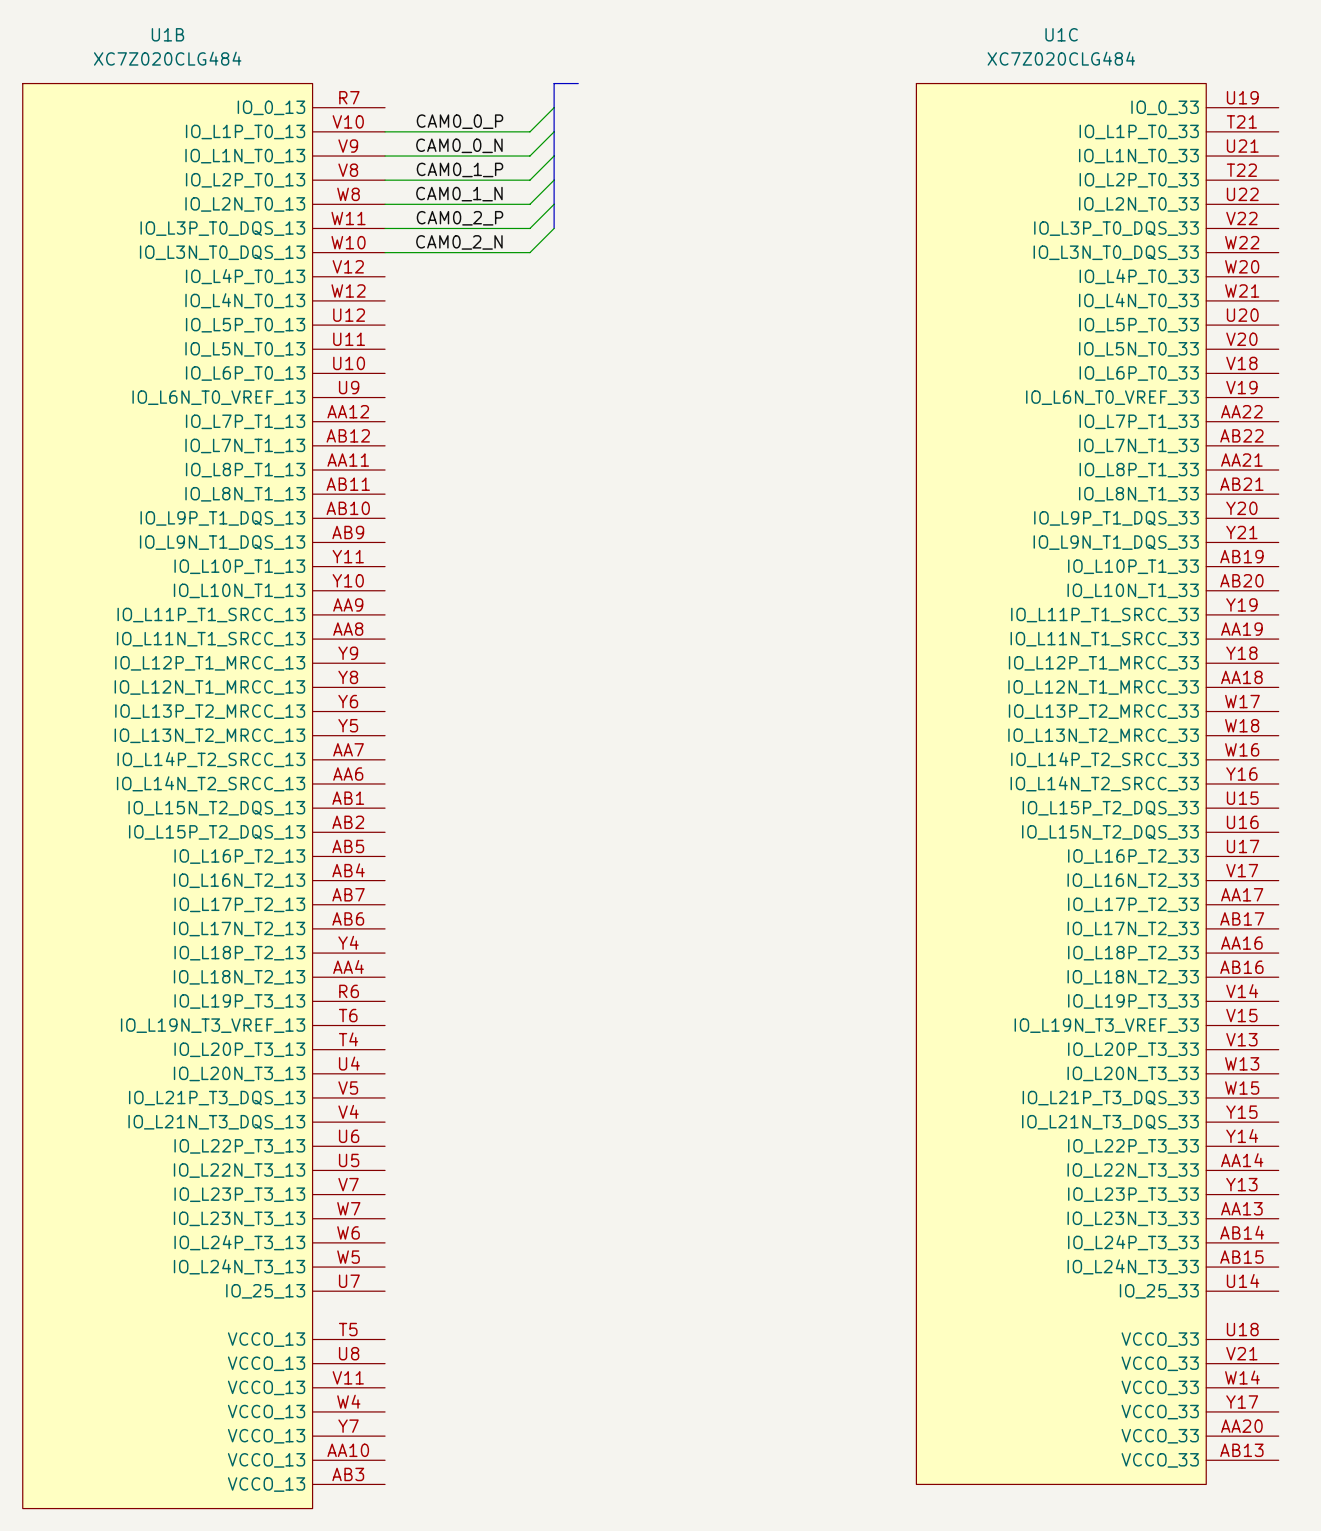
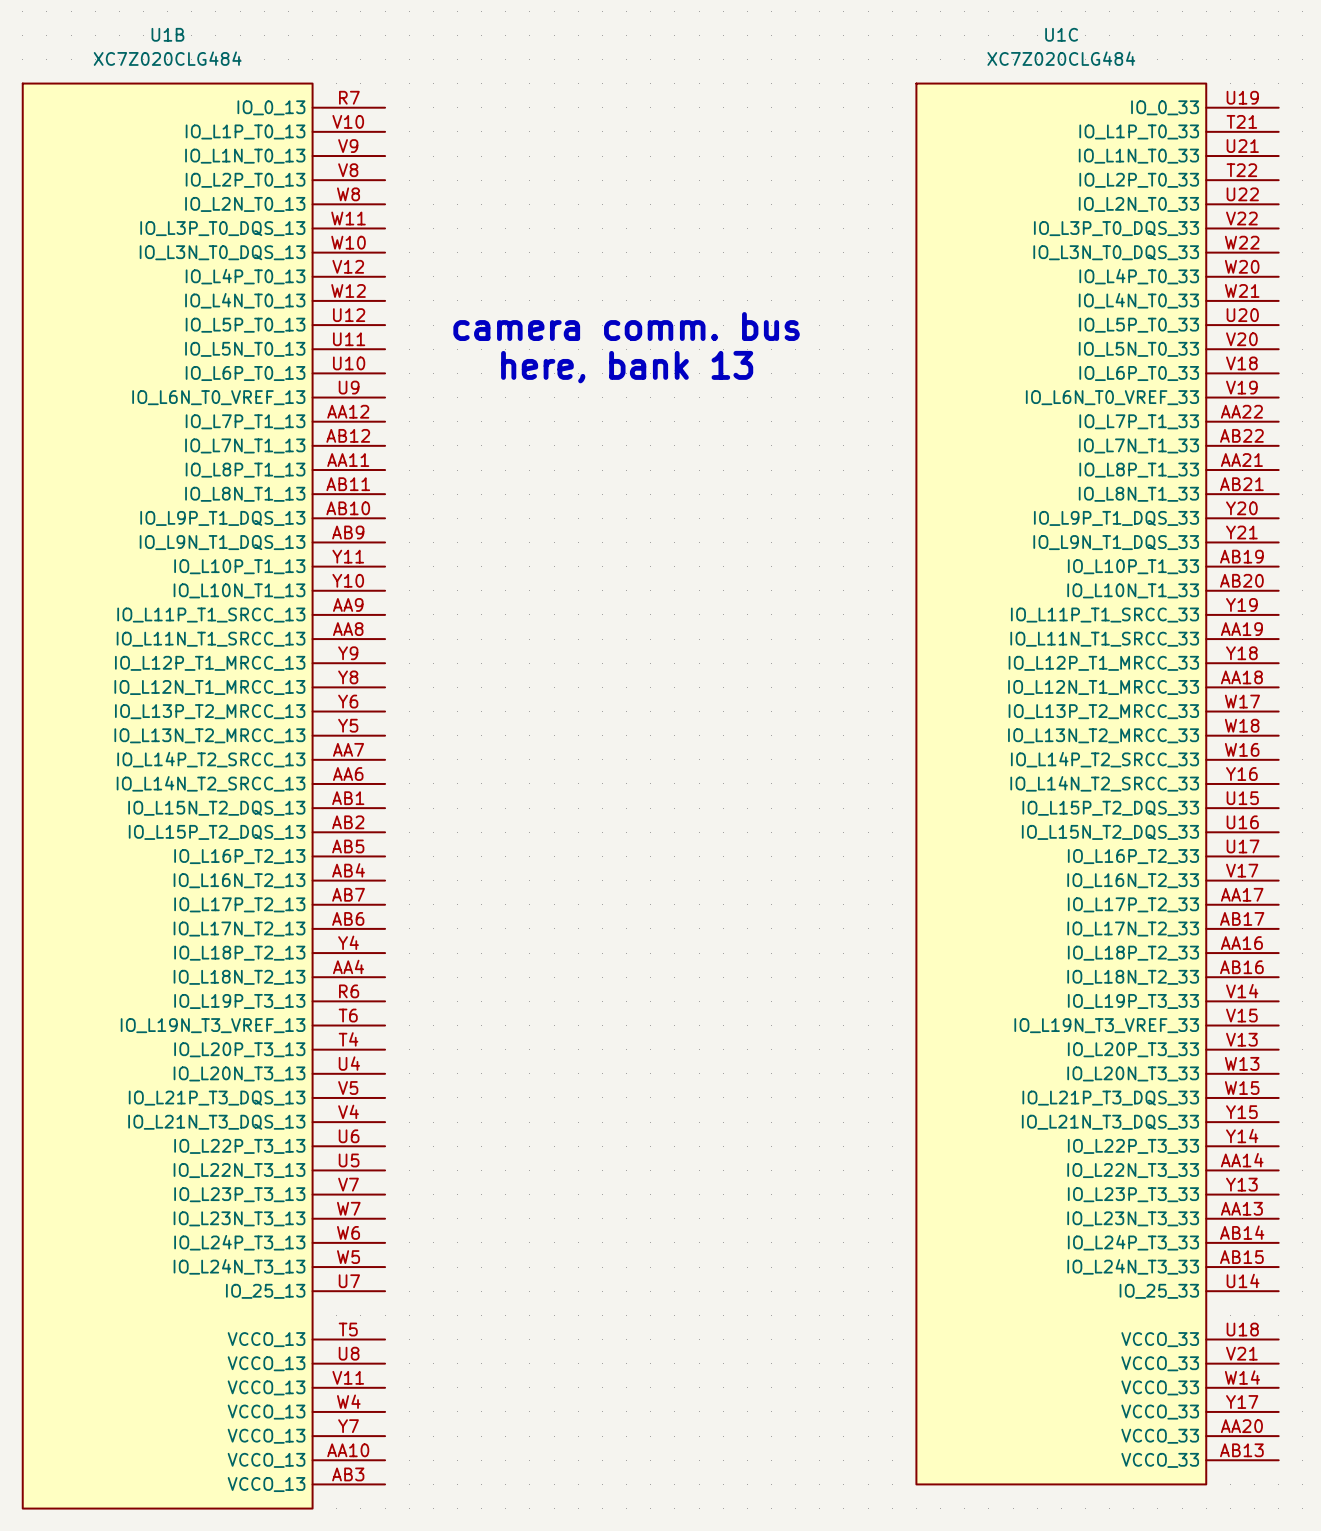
bus: (578, 83) (554, 83) (554, 228) -> none
wire: (554, 107) (529, 131) (385, 131) -> none
label: CAM0_0_P (459, 121) -> none
wire: (554, 131) (529, 156) (385, 156) -> none
label: CAM0_0_N (459, 145) -> none
wire: (554, 156) (529, 180) (385, 180) -> none
label: CAM0_1_P (459, 169) -> none
wire: (554, 180) (529, 204) (385, 204) -> none
label: CAM0_1_N (459, 194) -> none
wire: (554, 204) (529, 228) (385, 228) -> none
label: CAM0_2_P (459, 218) -> none
wire: (554, 228) (529, 252) (385, 252) -> none
label: CAM0_2_N (459, 242) -> none
text: none -> camera comm. bus (626, 326)
text: none -> here, bank 13 (627, 367)

